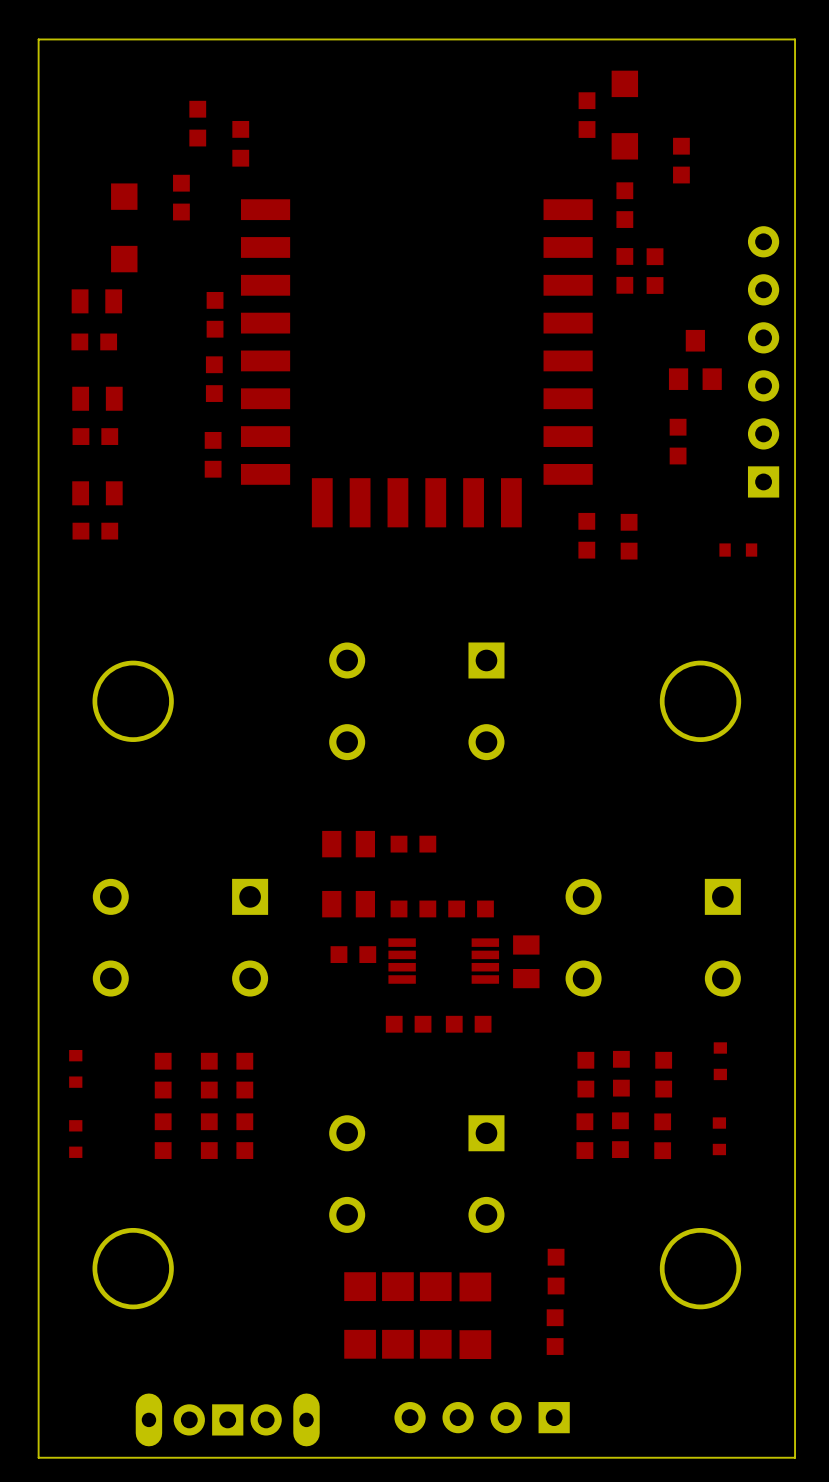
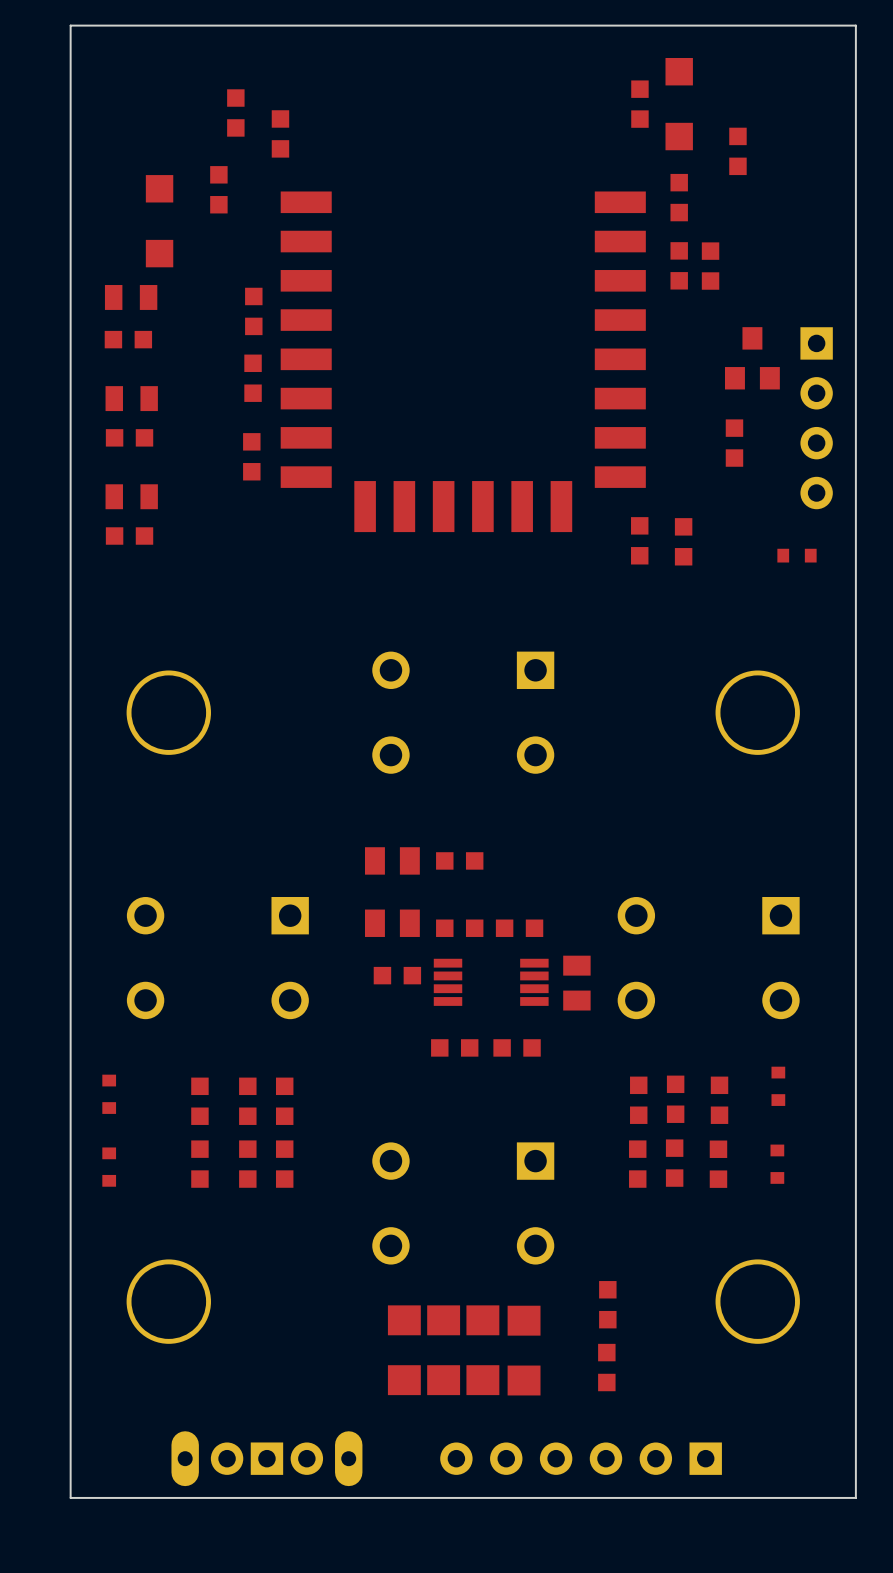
part: (763, 361) -> none
part: none -> (816, 418)
part: (482, 1417) -> none
part: none -> (581, 1458)

